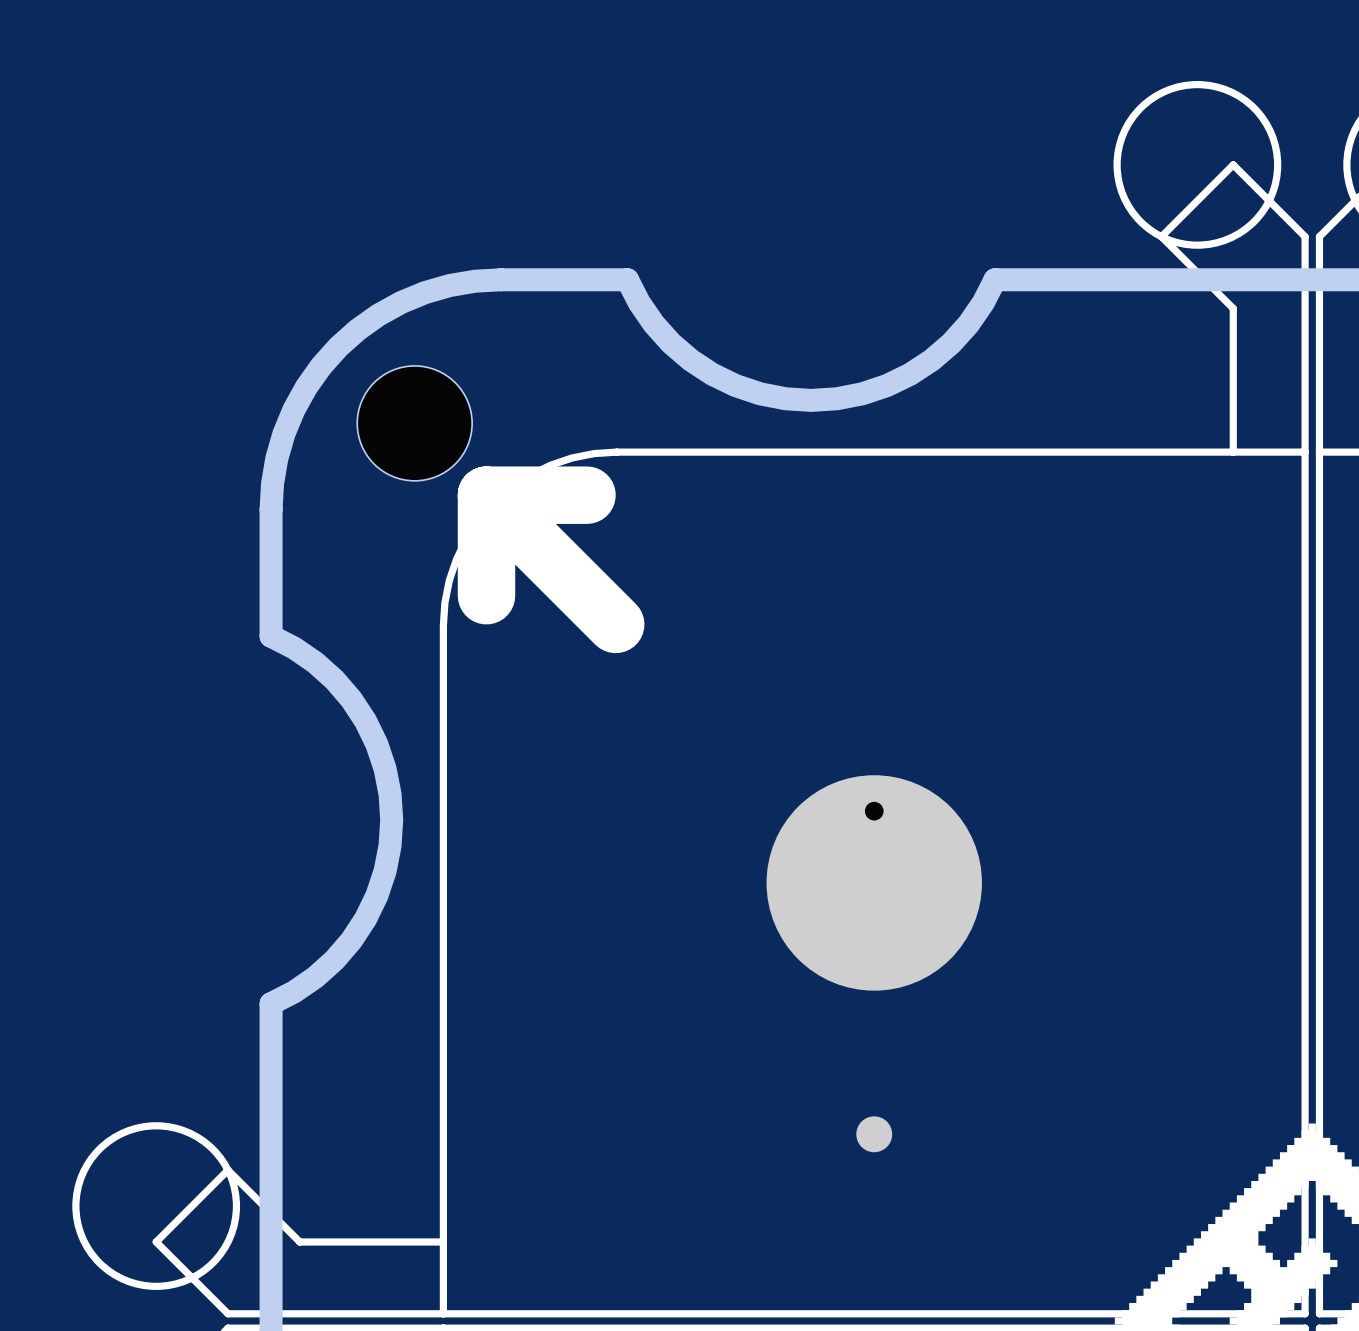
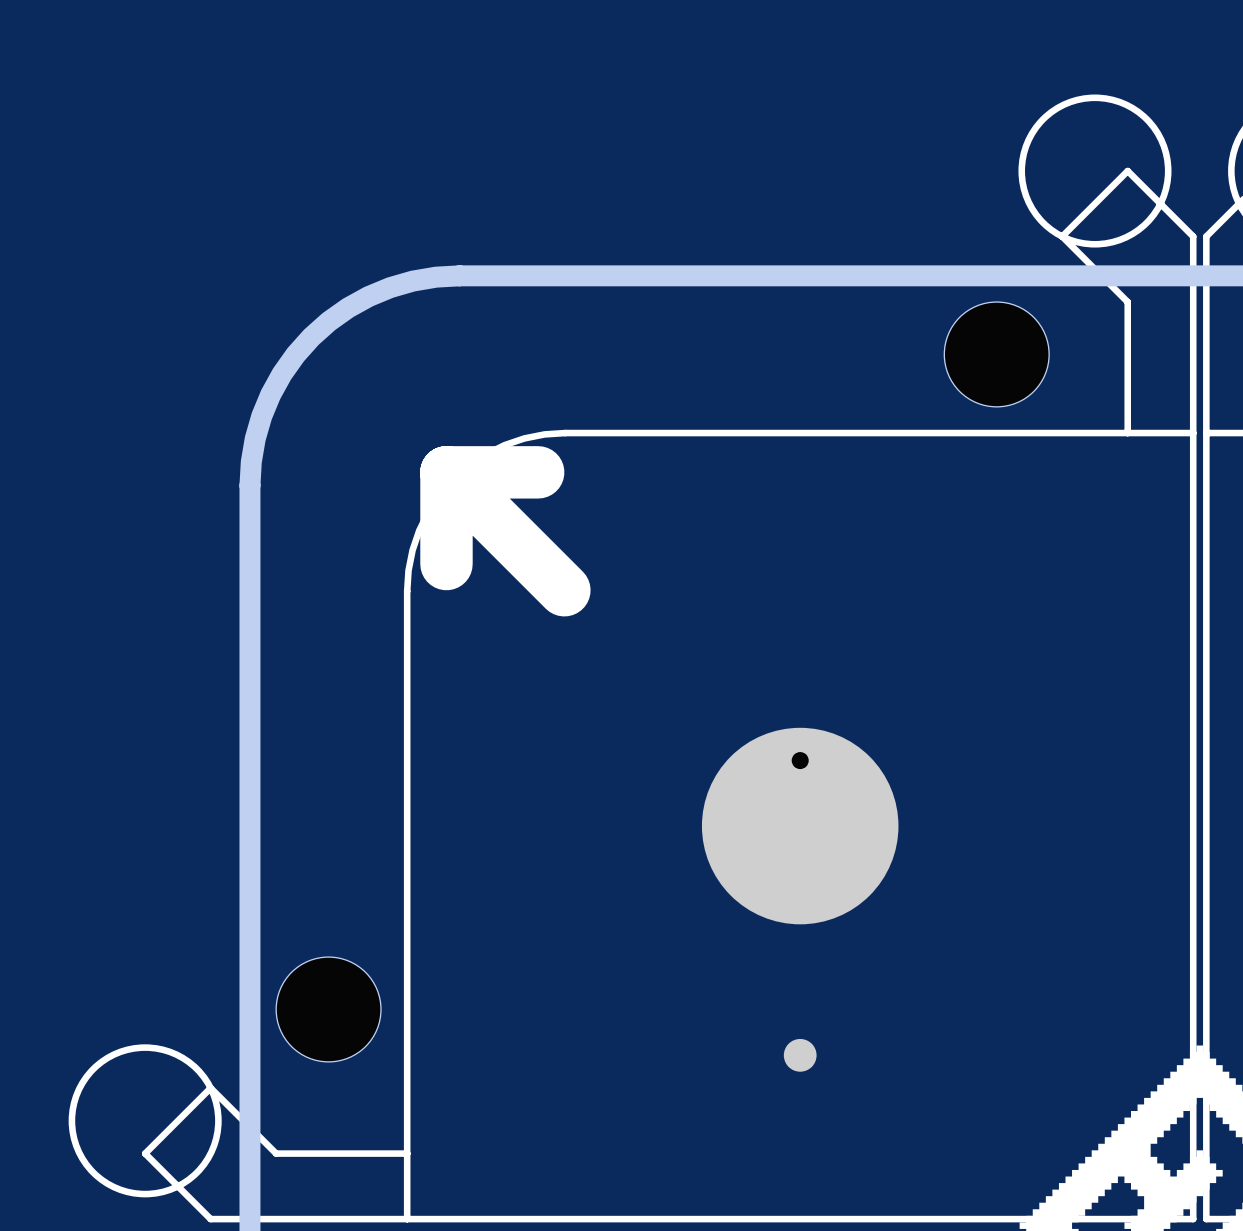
board edge: (995, 279) (983, 302) (968, 324) (951, 343) (931, 360) (910, 374) (886, 385) (862, 393) (837, 398) (811, 400) (785, 398) (760, 393) (735, 385) (712, 374) (690, 360) (671, 343) (653, 324) (639, 302) (627, 279) -> (910, 275) (575, 275)
hole: none -> (996, 354)
hole: (414, 423) -> none
board edge: (271, 636) (294, 647) (315, 662) (334, 679) (351, 699) (365, 721) (376, 744) (385, 768) (390, 794) (391, 819) (390, 845) (385, 871) (376, 895) (365, 918) (351, 940) (334, 960) (315, 977) (294, 991) (271, 1003) -> (249, 600) (249, 936)
hole: none -> (328, 1009)

